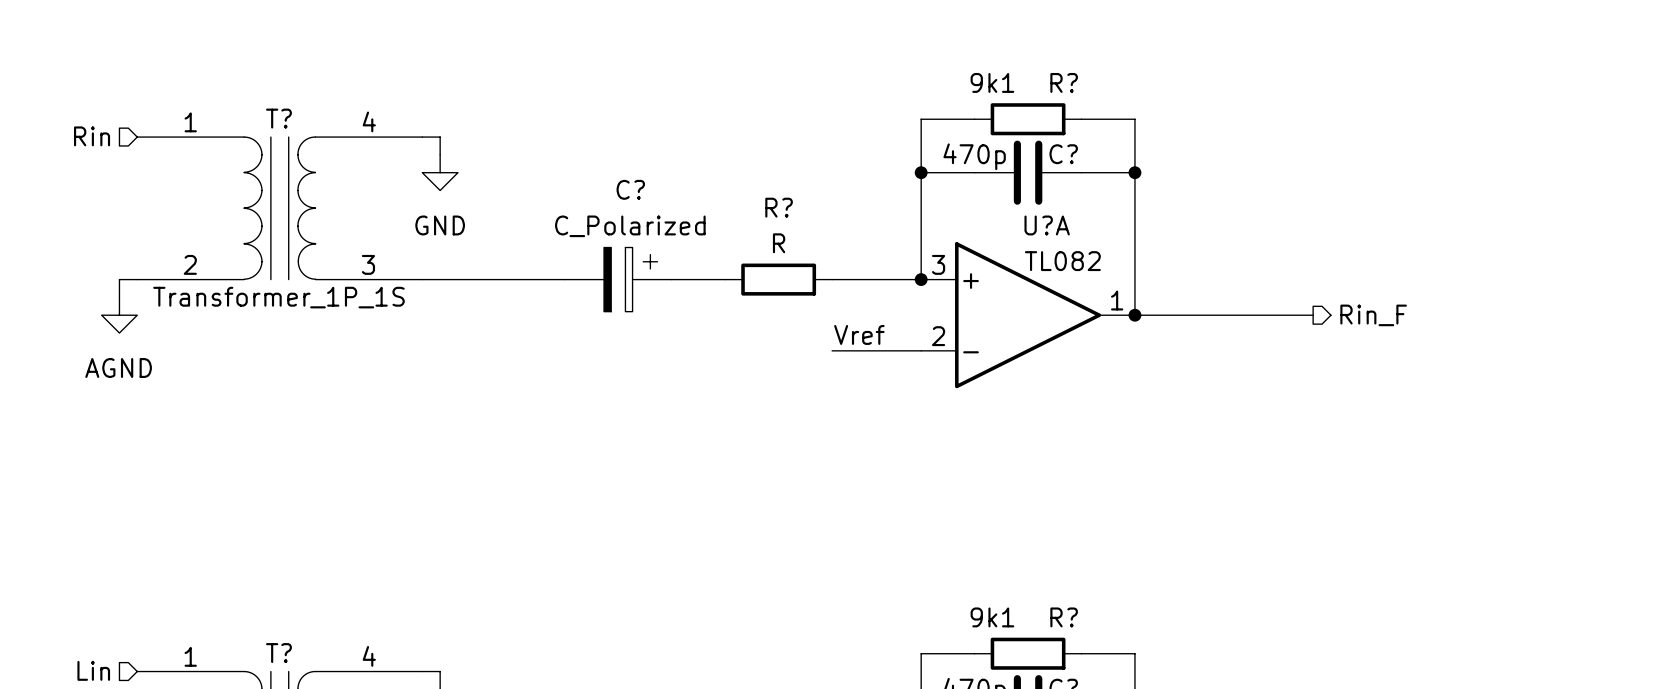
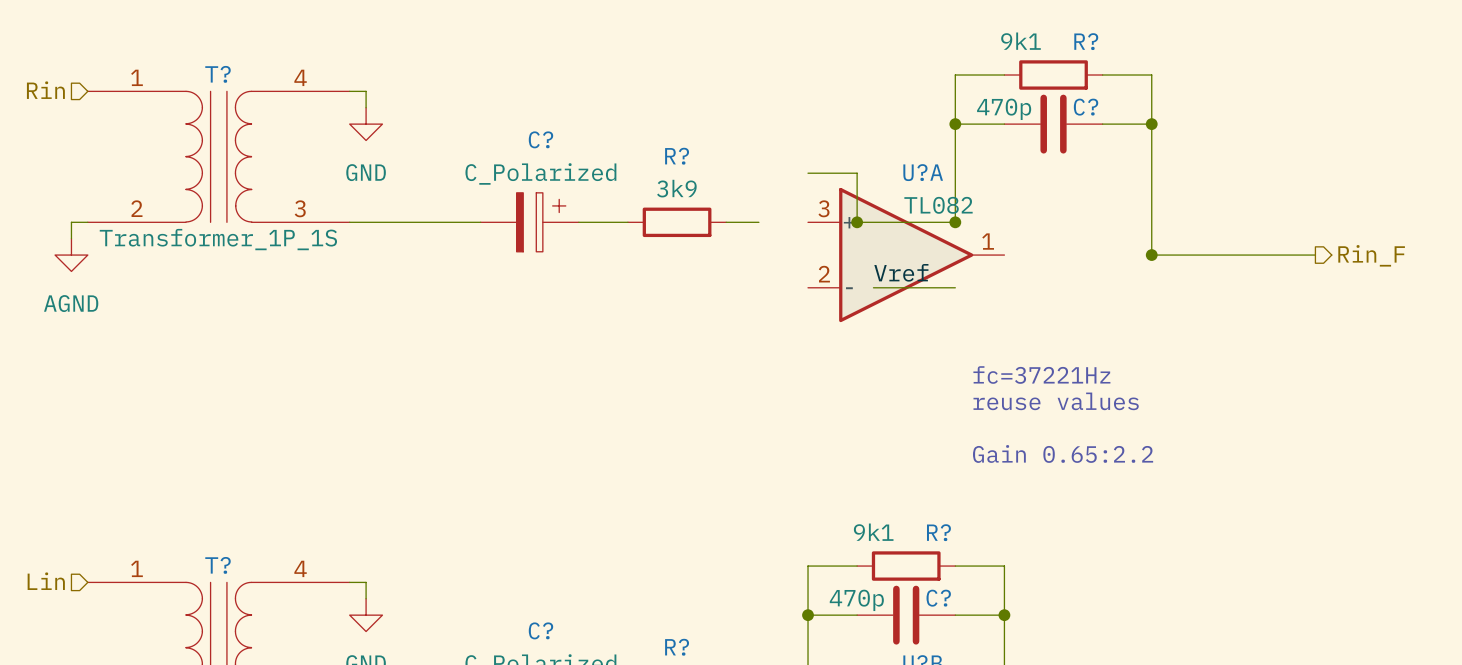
wire: (974, 119) (921, 119) (921, 279) (867, 279) -> none
R? position: (1028, 119) -> (1053, 75)
wire: none -> (955, 75) (955, 222) (857, 222) (857, 173) (808, 173)
wire: (1134, 119) (1134, 315) (1295, 315) -> (1102, 75) (1151, 75) (1151, 255)
wire: (921, 172) (974, 172) -> (1102, 124) (1151, 124)
junction: (921, 172) -> none
C? position: (1028, 172) -> (1053, 124)
junction position: (1134, 172) -> (955, 124)
junction: none -> (1151, 124)
R? value: R (779, 243) -> 3k9 (676, 188)
junction position: (921, 279) -> (857, 222)
junction: none -> (955, 222)
junction: (1134, 315) -> none
junction: none -> (1151, 255)
wire: none -> (1168, 255) (1315, 255)
hierarchical label position: Rin_F (1373, 315) -> Rin_F (1371, 255)
label position: Vref (859, 334) -> Vref (901, 272)
wire: (832, 350) (921, 350) -> (873, 287) (955, 287)
text: none -> fc=37221Hz (1041, 375)
text: none -> reuse values (1056, 401)
text: none -> Gain 0.65:2.2 (1063, 453)

